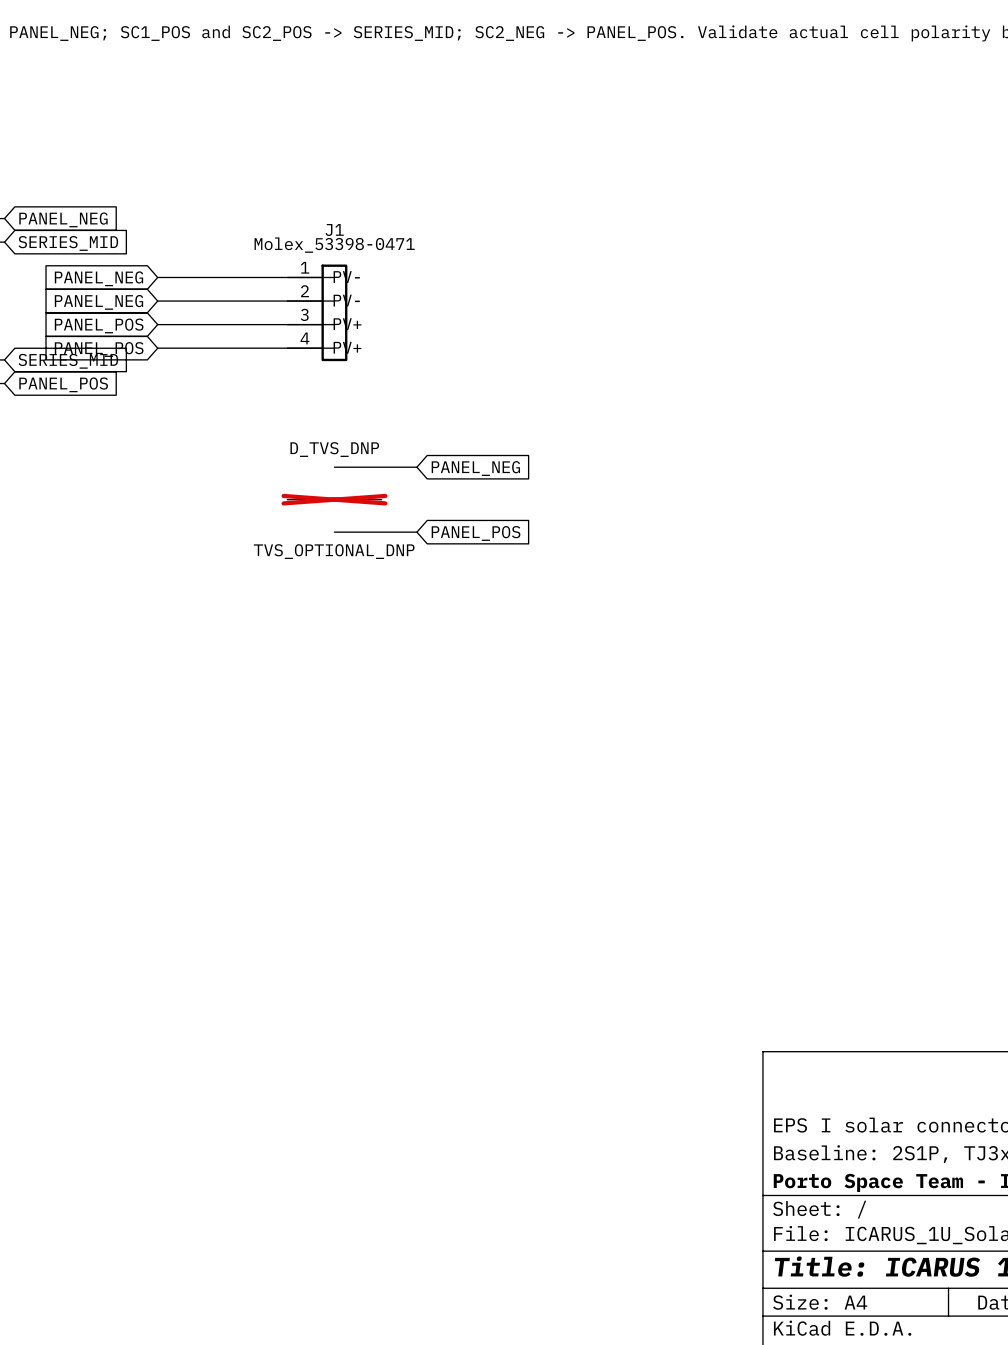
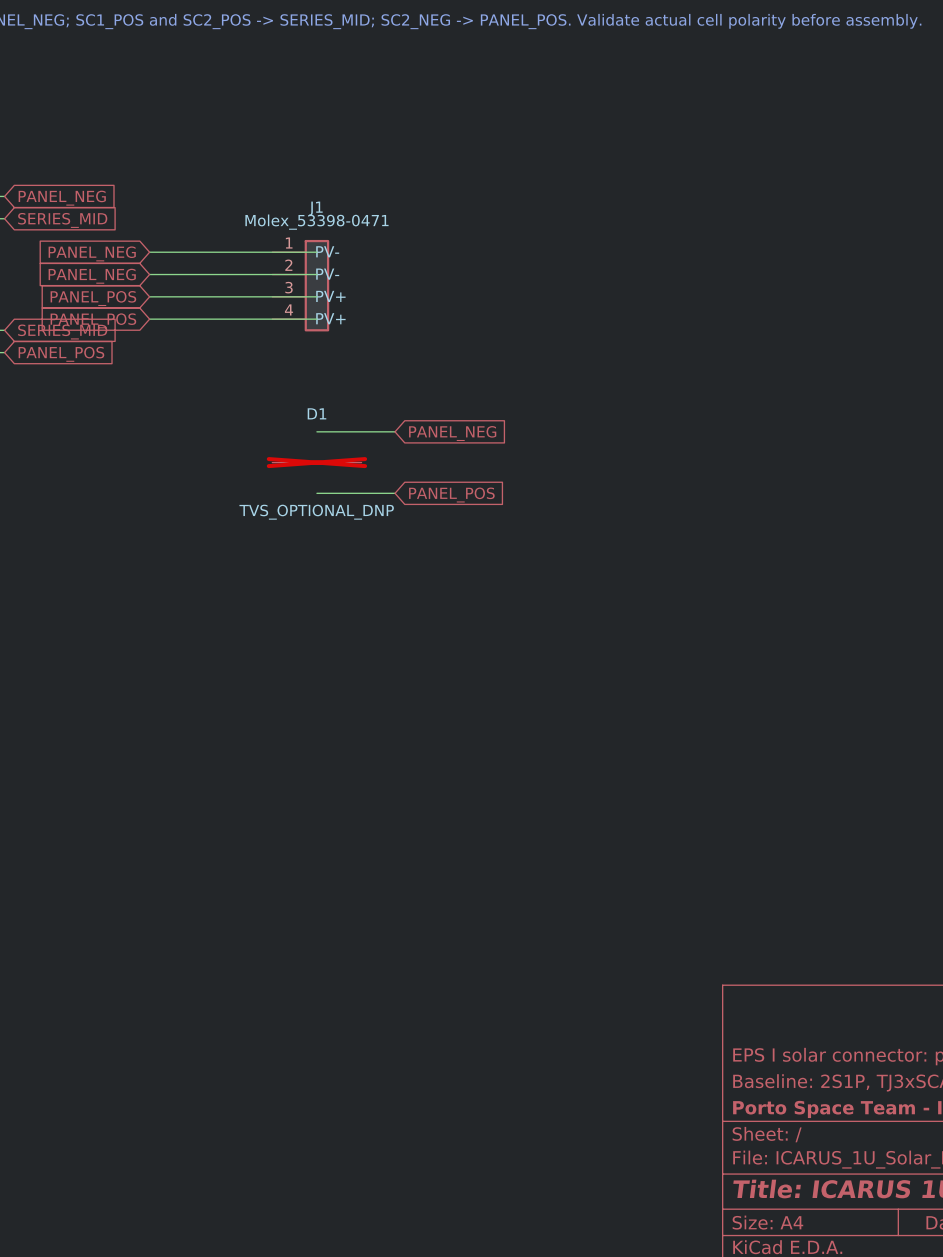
D_TVS_DNP name: D_TVS_DNP (334, 449) -> D1 (316, 413)

